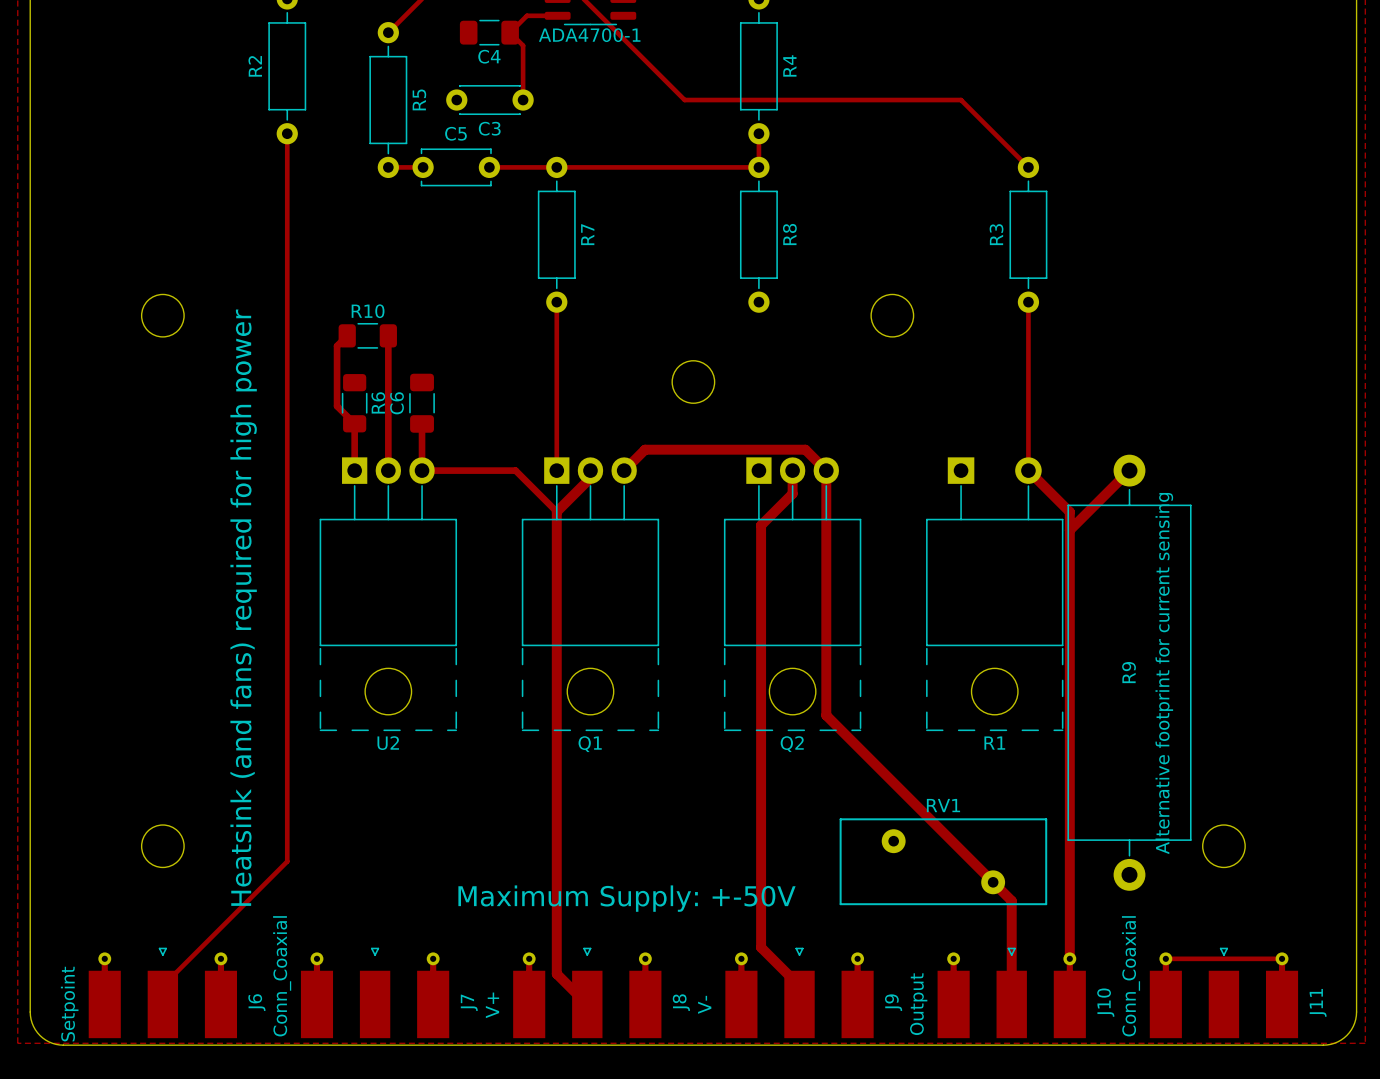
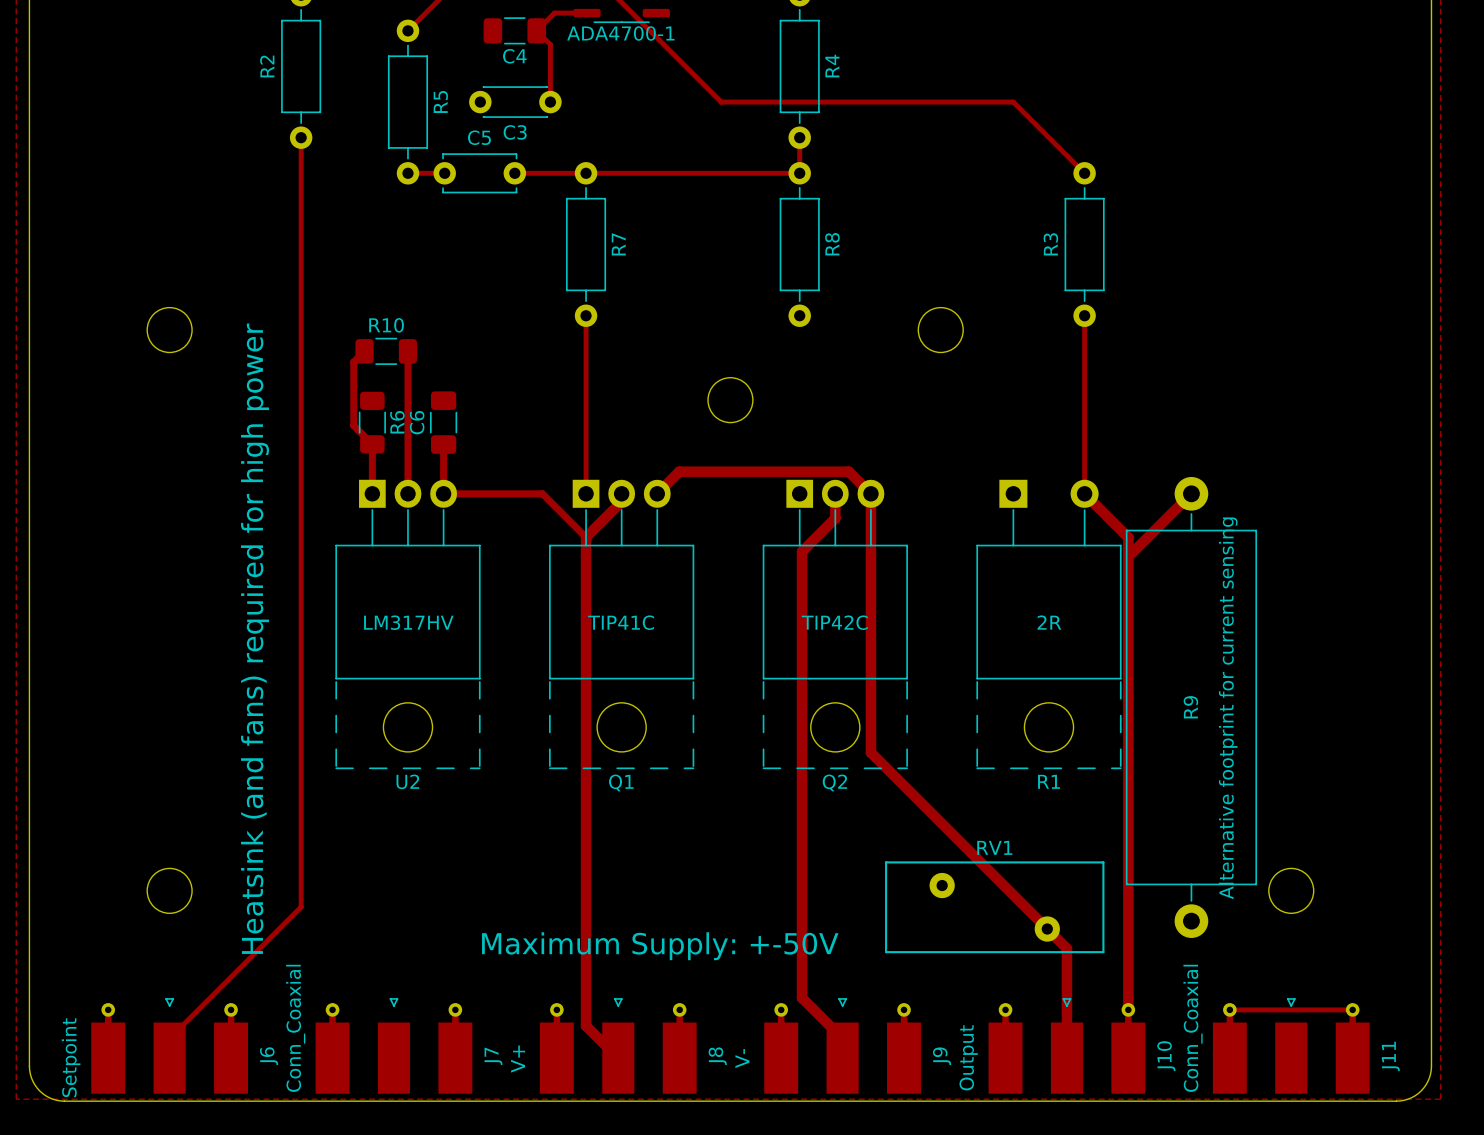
U2 value: none -> LM317HV (408, 622)
Q1 value: none -> TIP41C (621, 622)
Q2 value: none -> TIP42C (834, 622)
R1 value: none -> 2R (1049, 622)

